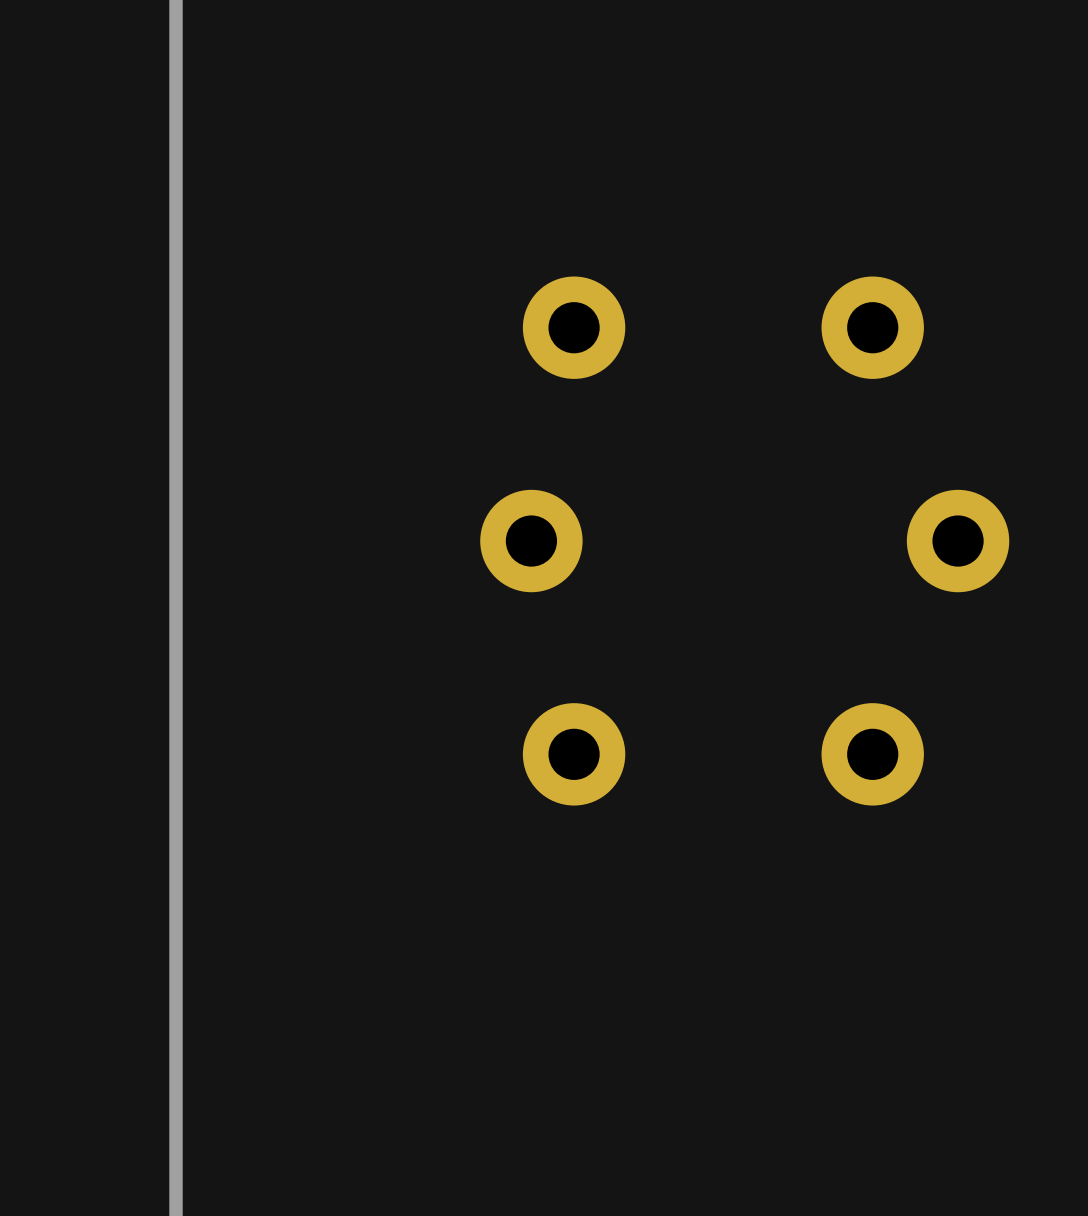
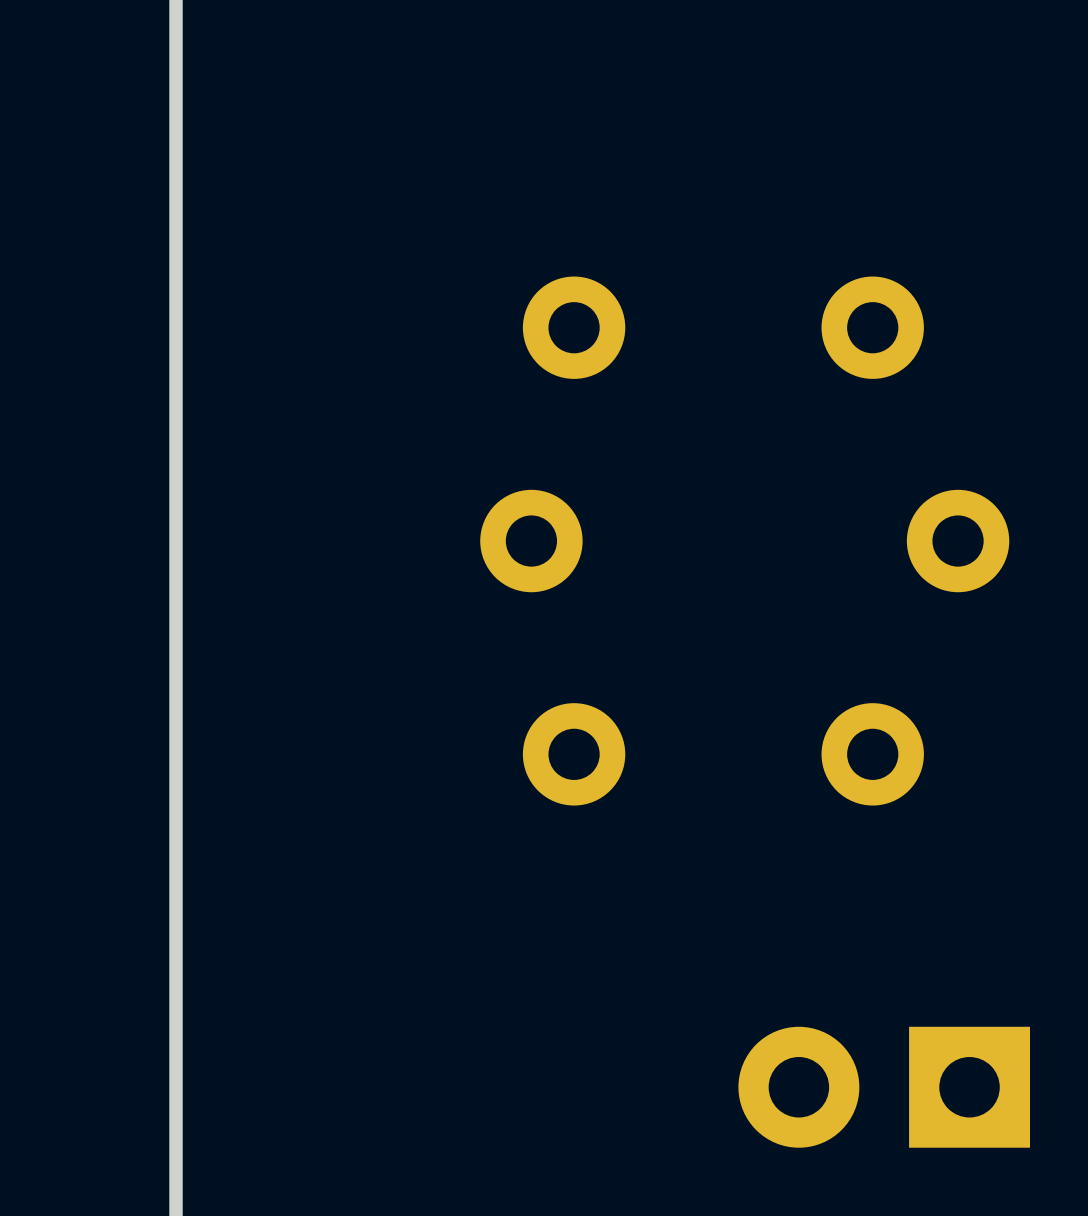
part: none -> (884, 1087)

